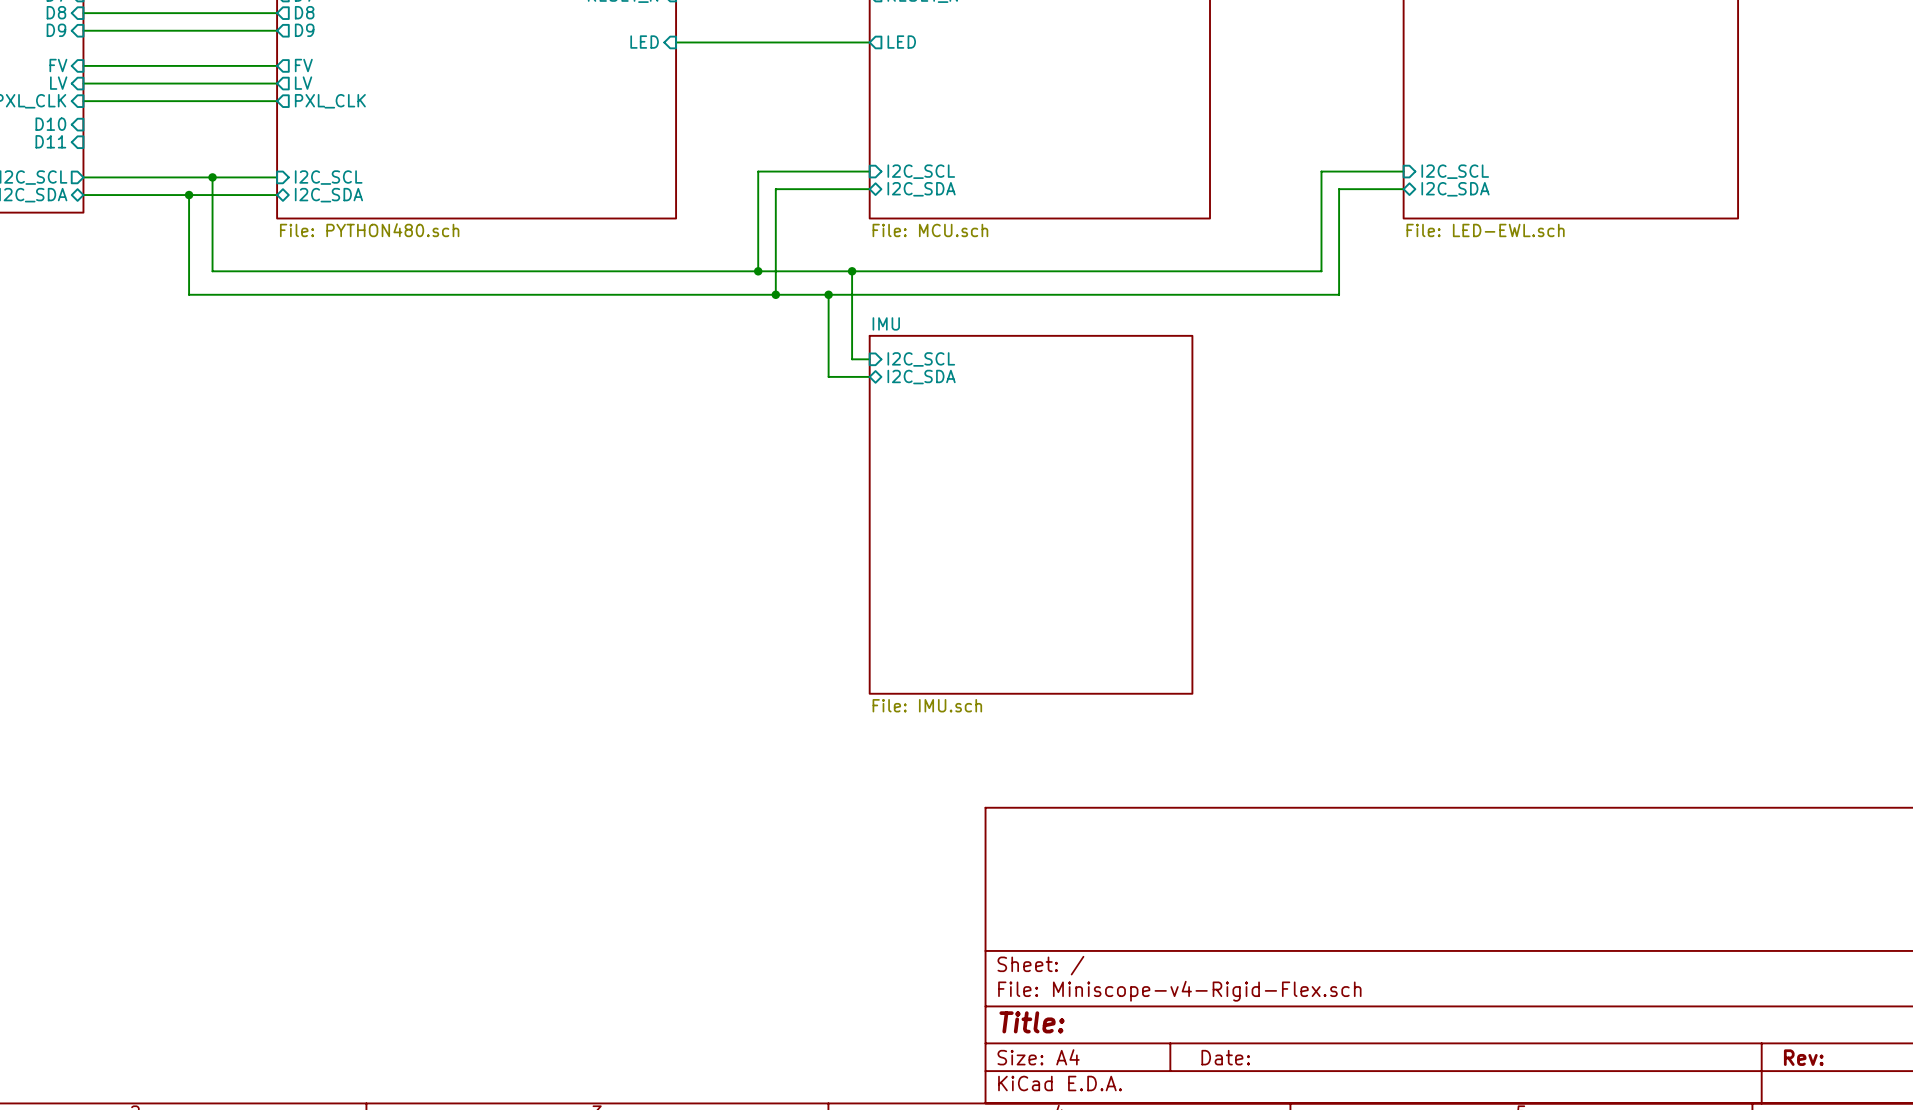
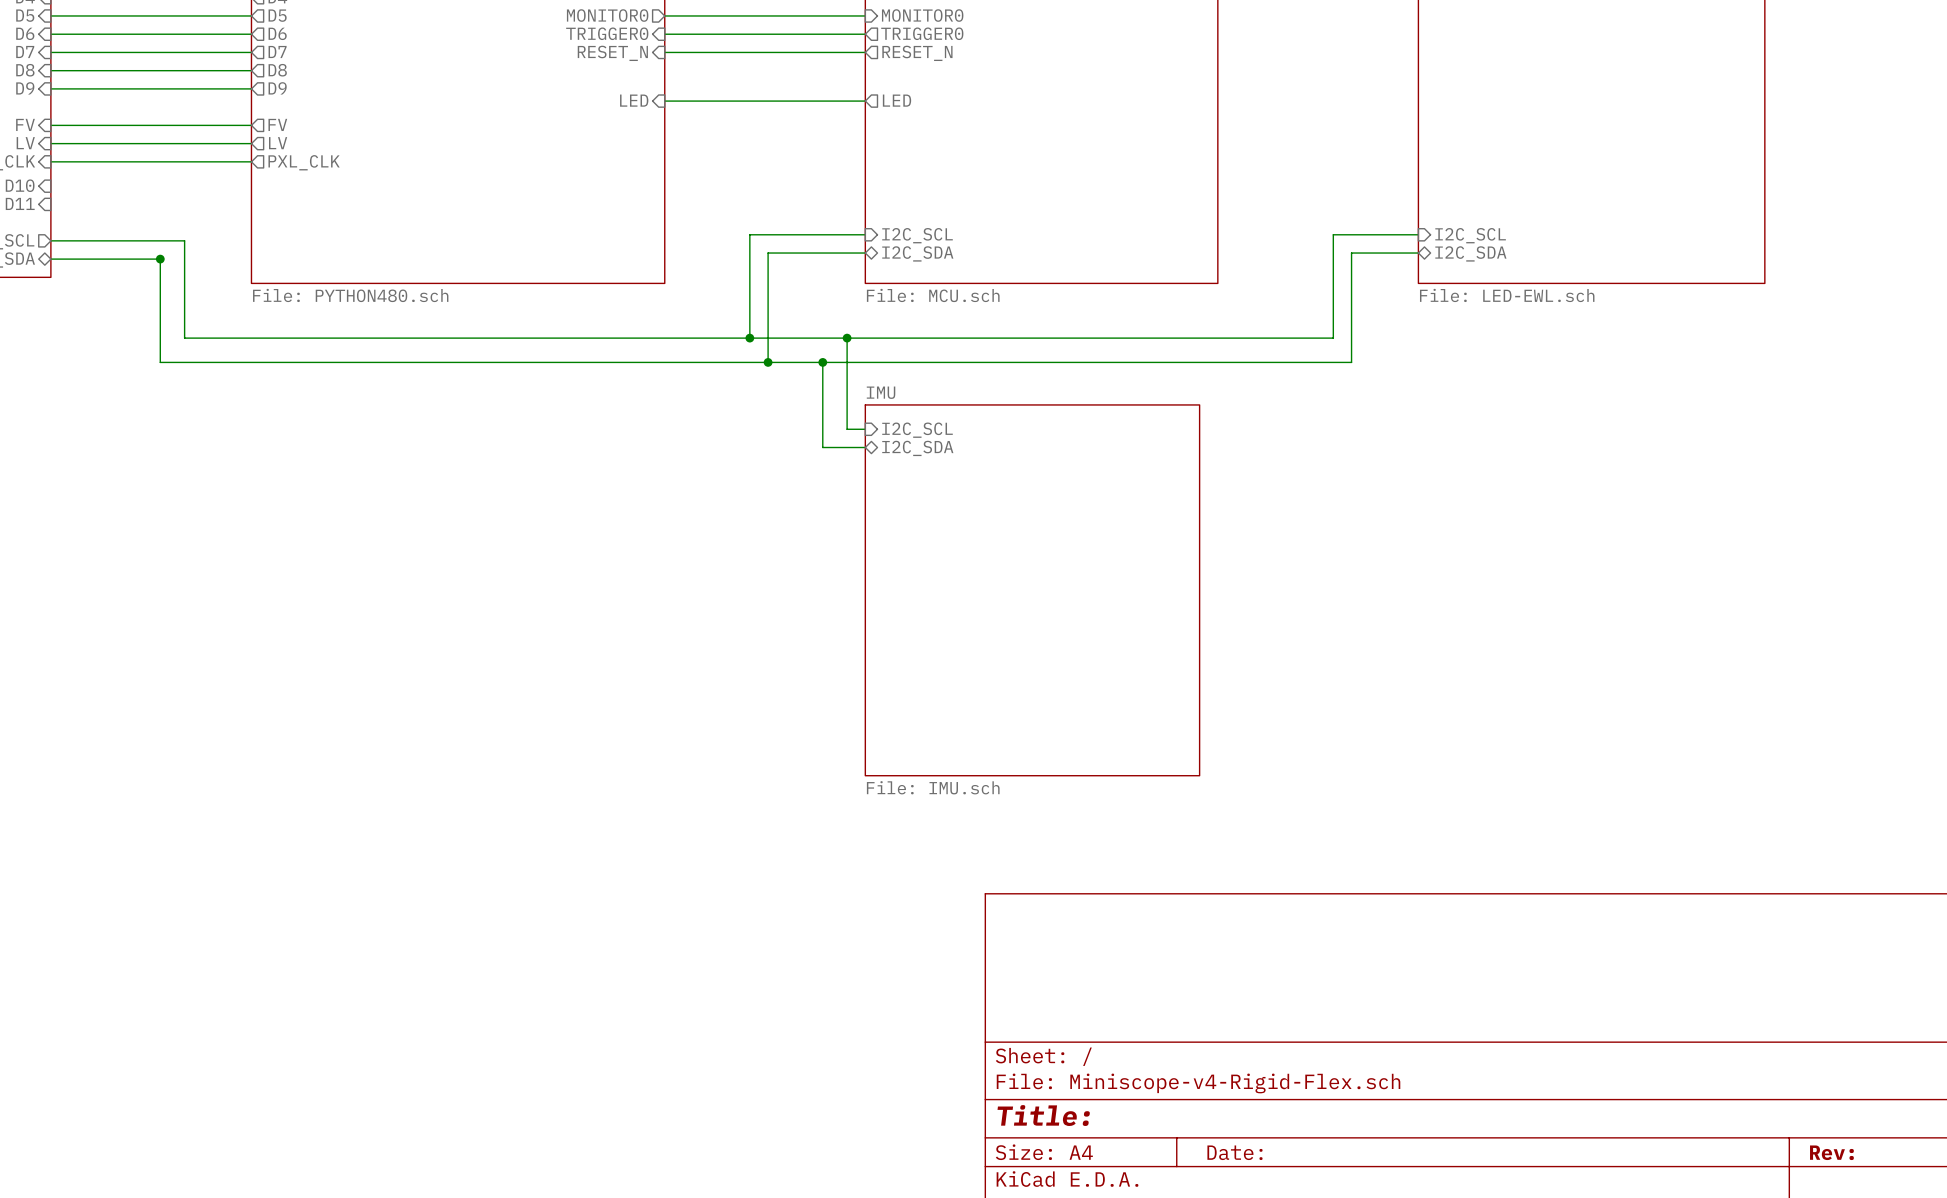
wire: (212, 177) (277, 177) -> none
junction: (212, 177) -> none
sheet pin: I2C_SCL (328, 177) -> none
wire: (189, 195) (277, 195) -> none
sheet pin: I2C_SDA (328, 195) -> none

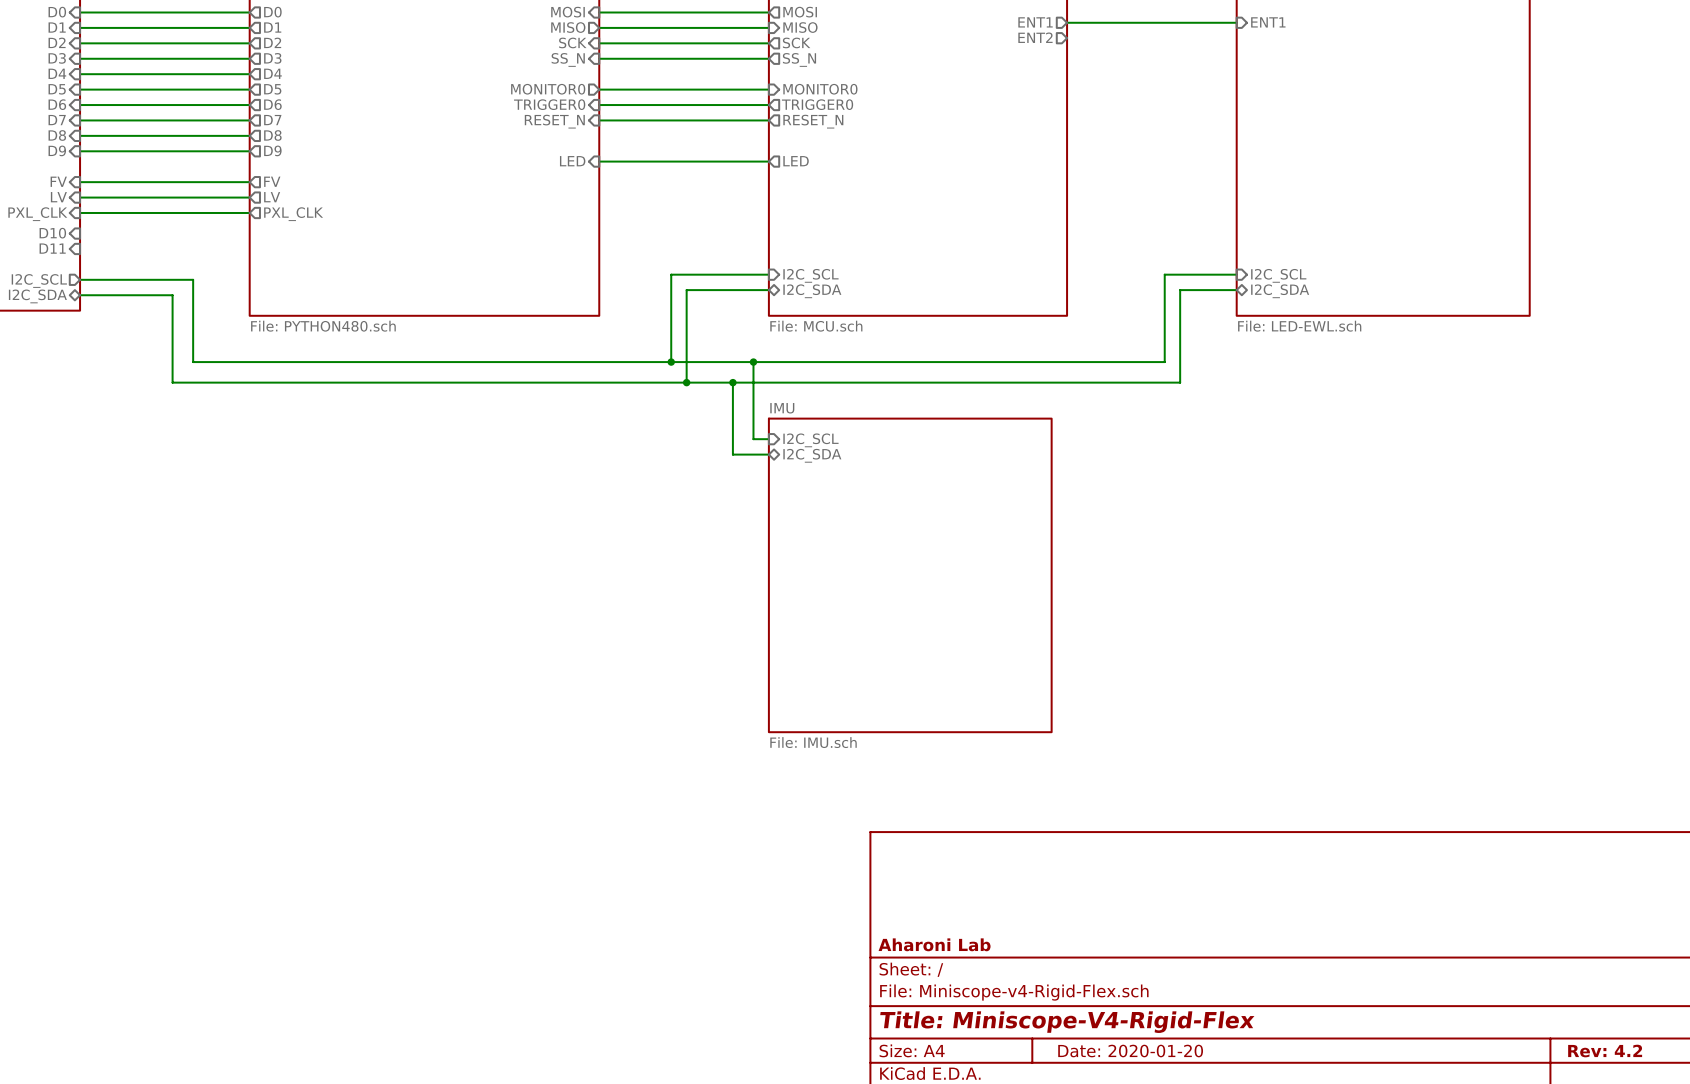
junction: (160, 259) -> none
title block: none -> Aharoni Lab (934, 944)
title block: Title: (1043, 1115) -> Title: Miniscope-V4-Rigid-Flex (1067, 1022)
title block: Date: (1234, 1152) -> Date: 2020-01-20 (1130, 1051)
title block: Rev: (1831, 1152) -> Rev: 4.2 (1605, 1051)

